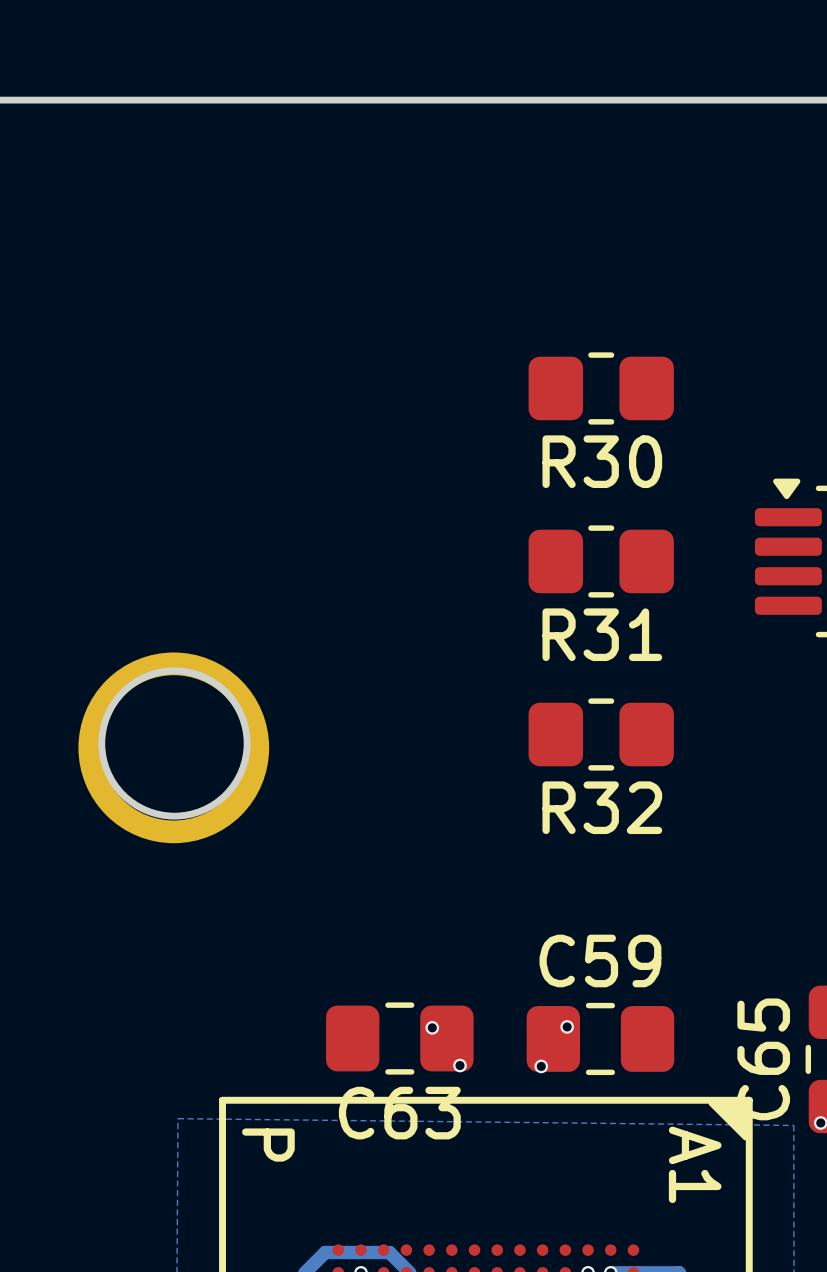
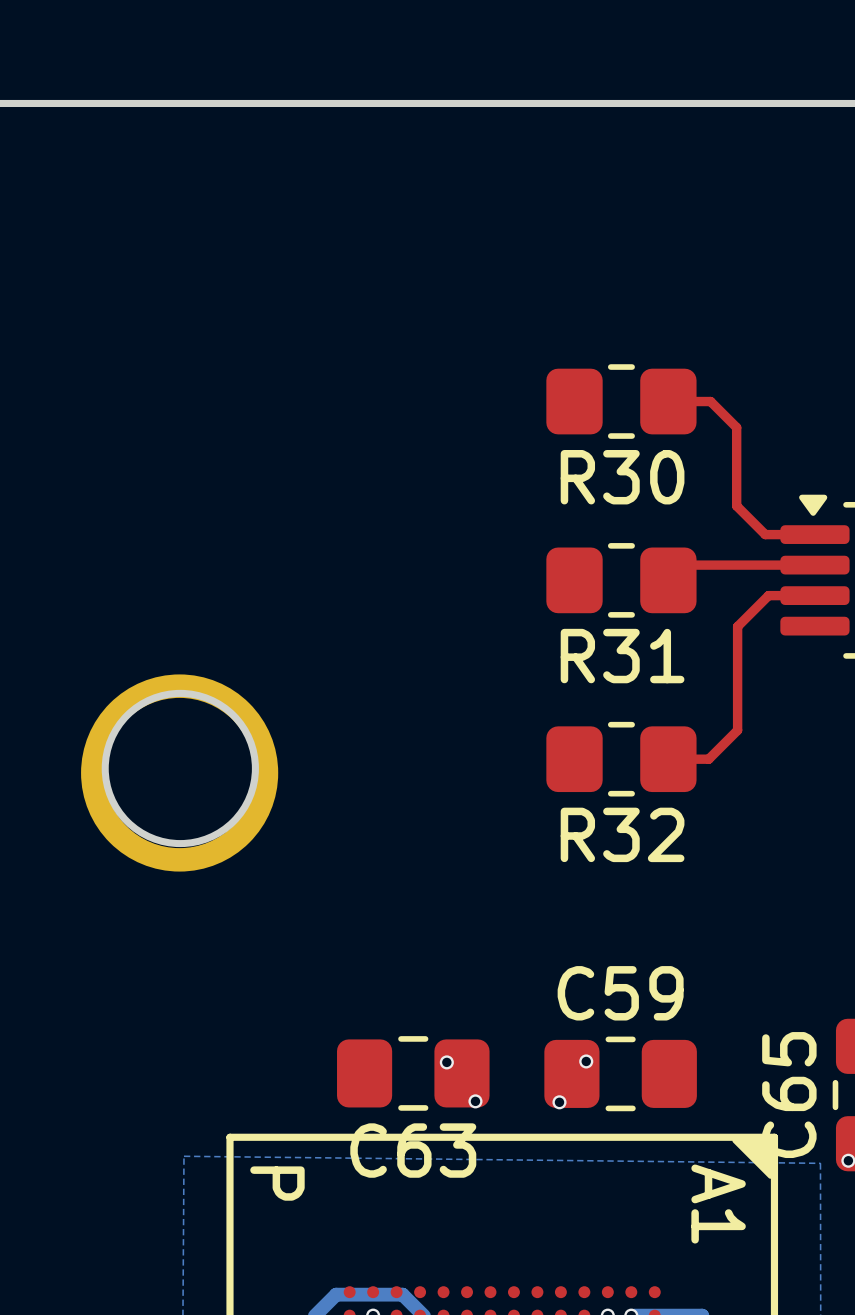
top track: none -> (668, 401) (710, 401) (736, 427) (736, 505) (765, 534) (814, 534)
top track: none -> (814, 565) (683, 565) (668, 580)
top track: none -> (814, 595) (768, 595) (737, 626) (737, 730) (708, 759) (668, 759)

